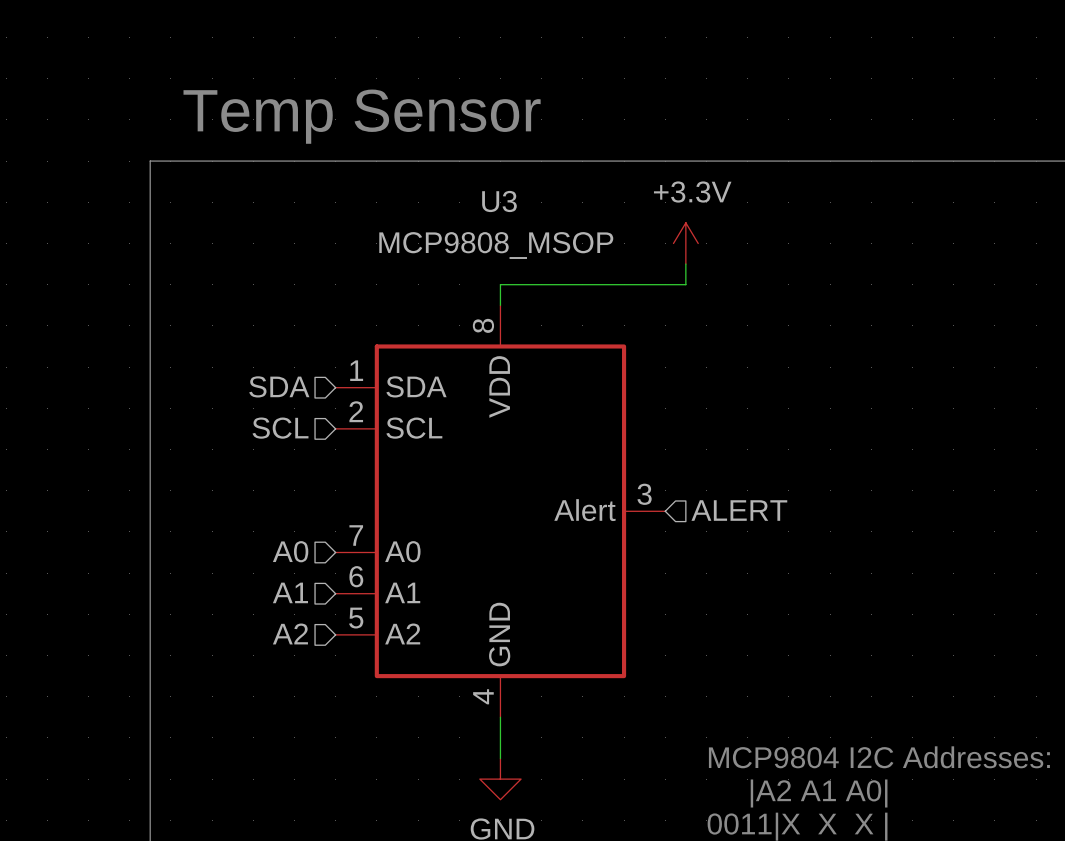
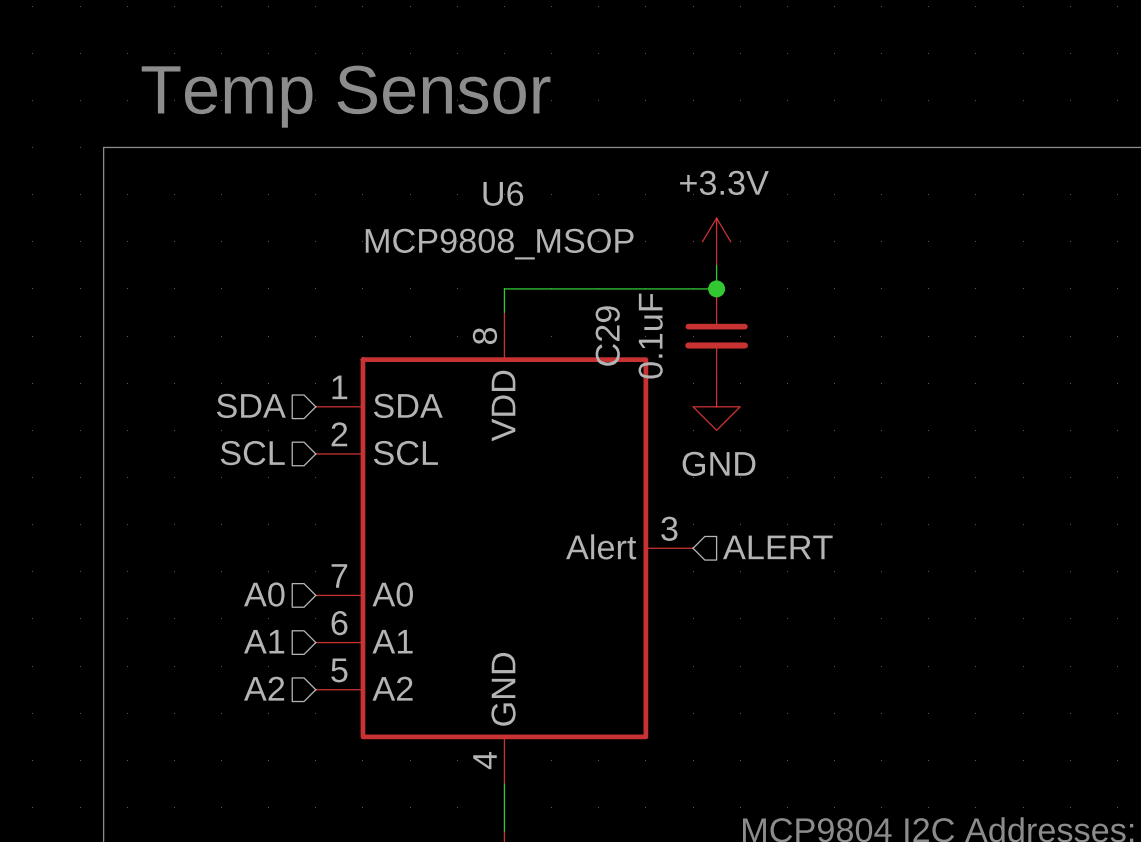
U3 name: U3 (499, 201) -> U6 (503, 193)
junction: none -> (716, 288)
C29: none -> 0.1uF (716, 336)
power symbol: none -> GND (716, 406)

